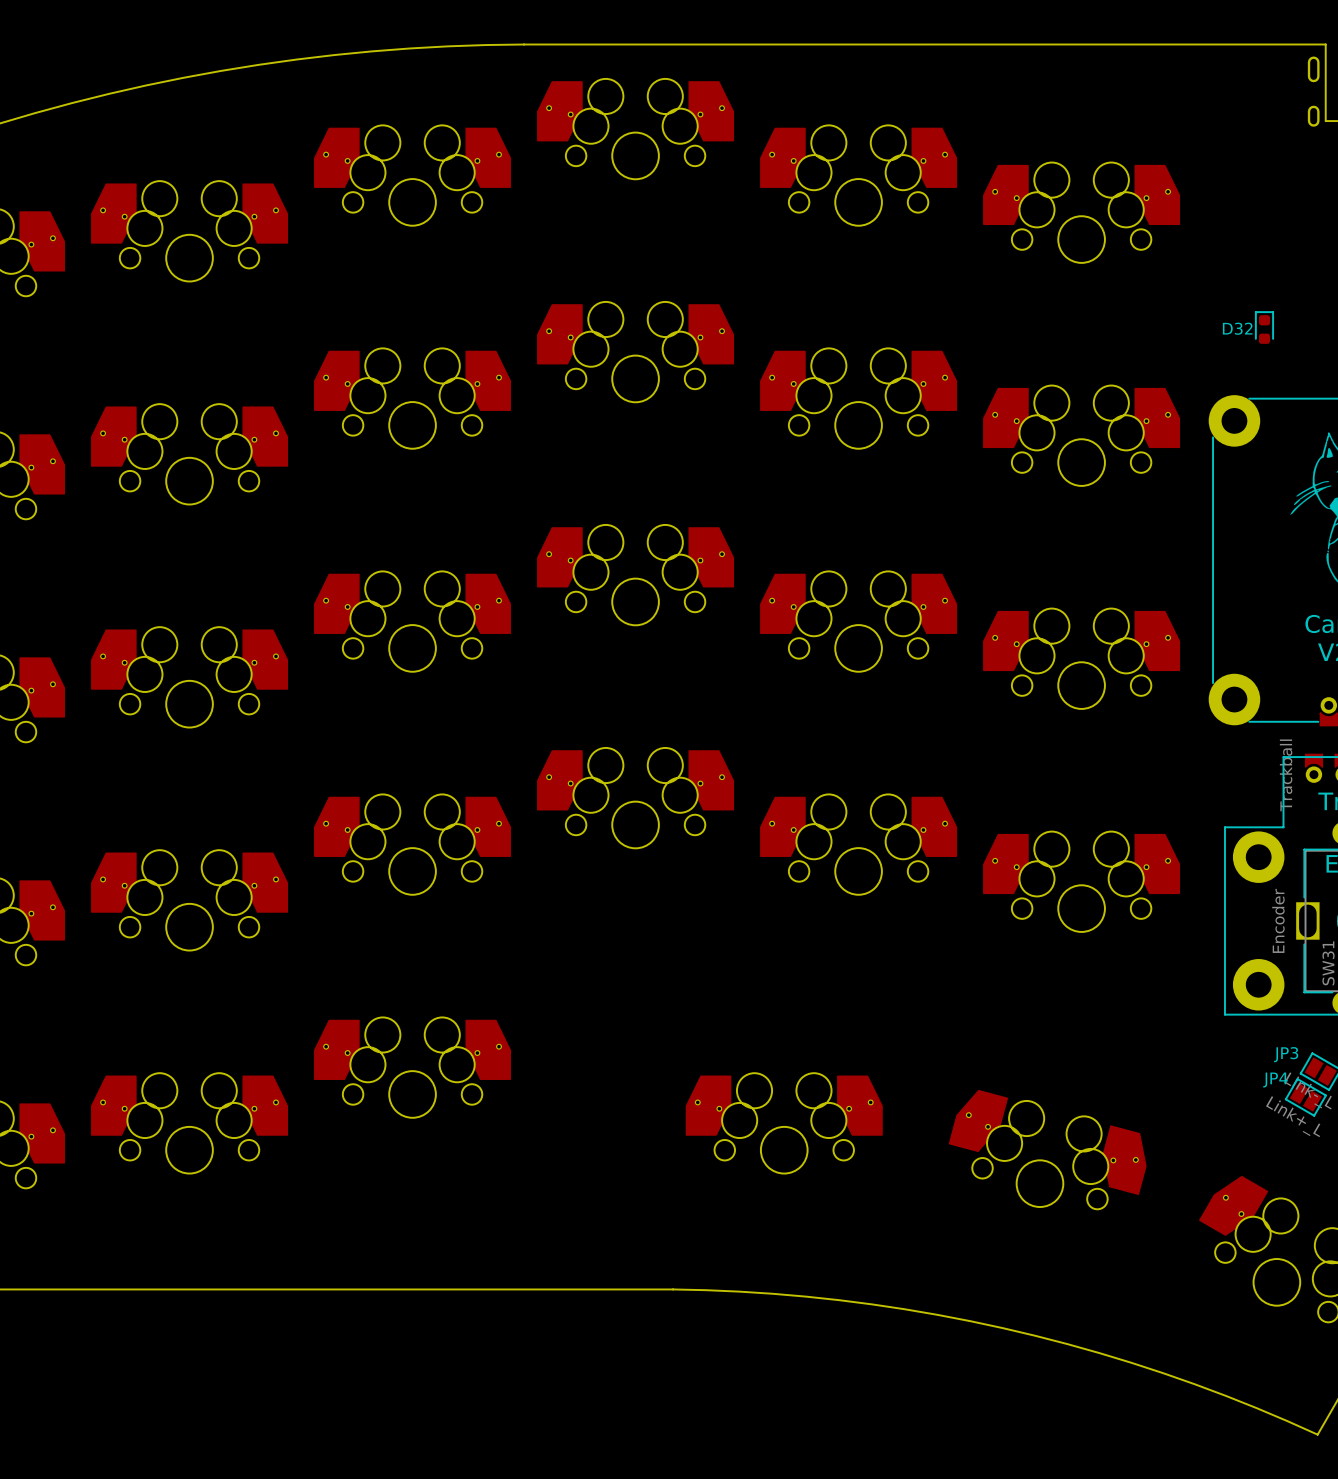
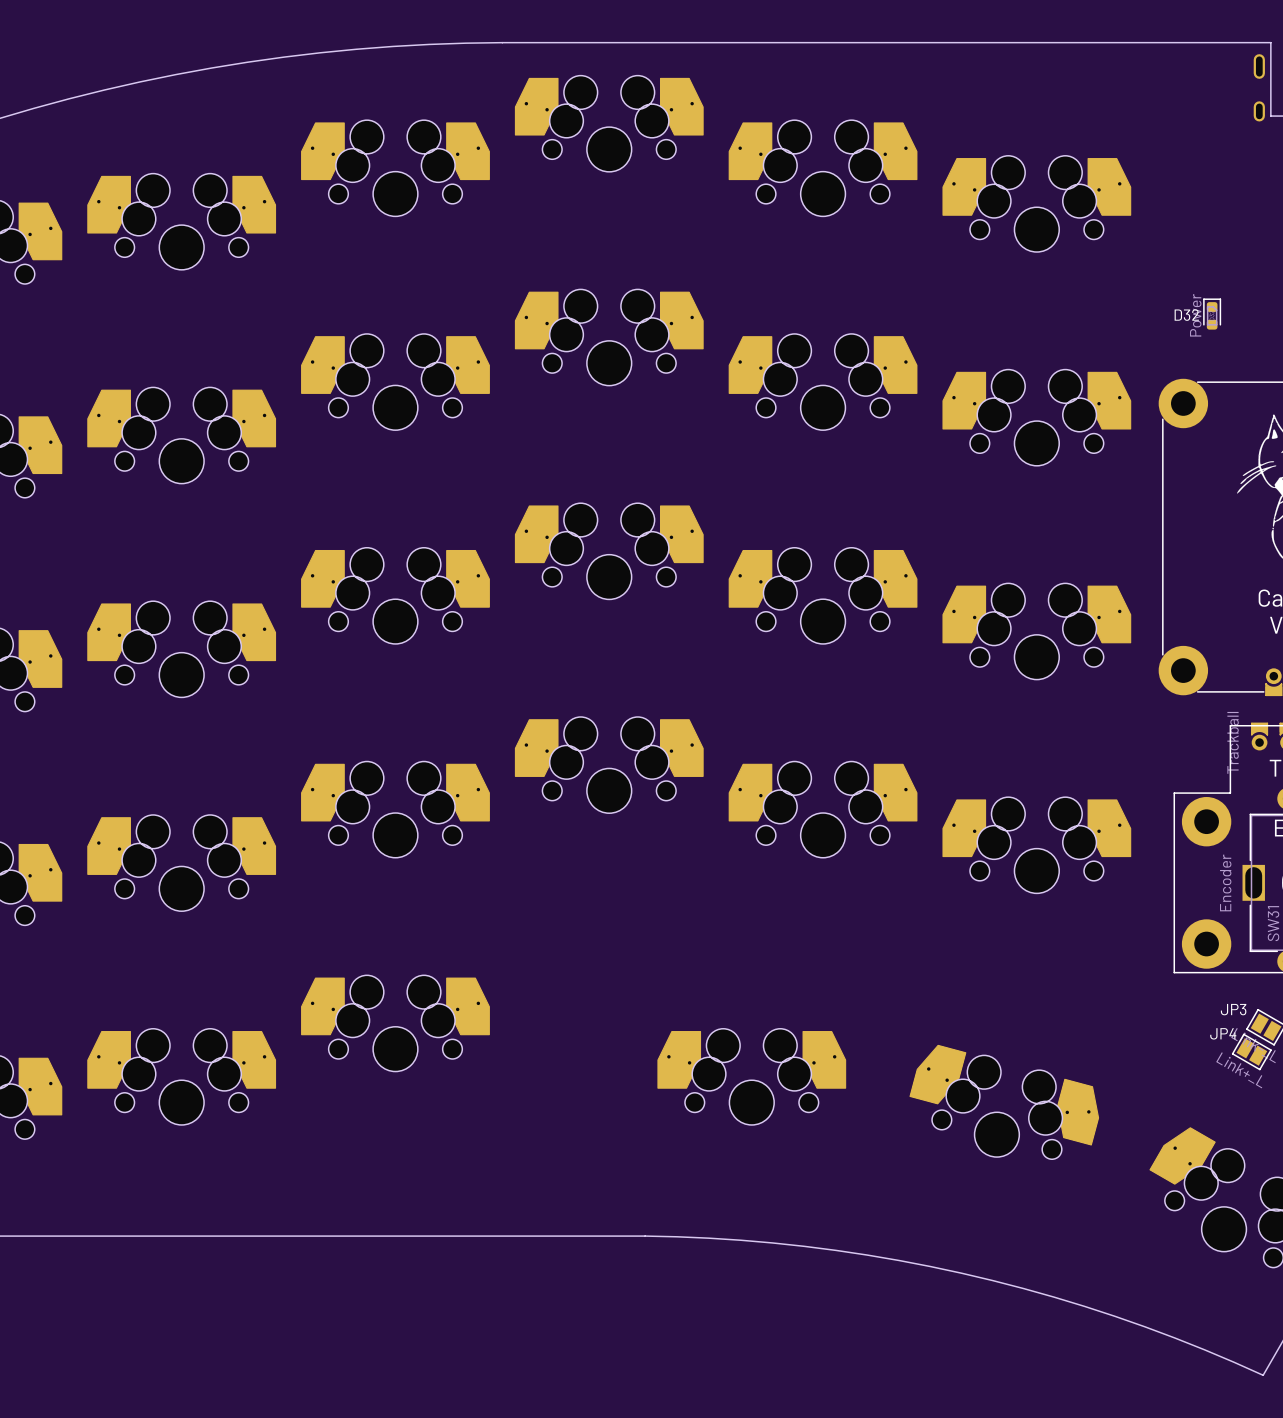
D32 side: bottom (1264, 327) -> top (1212, 314)
text: none -> D32 (1186, 315)

